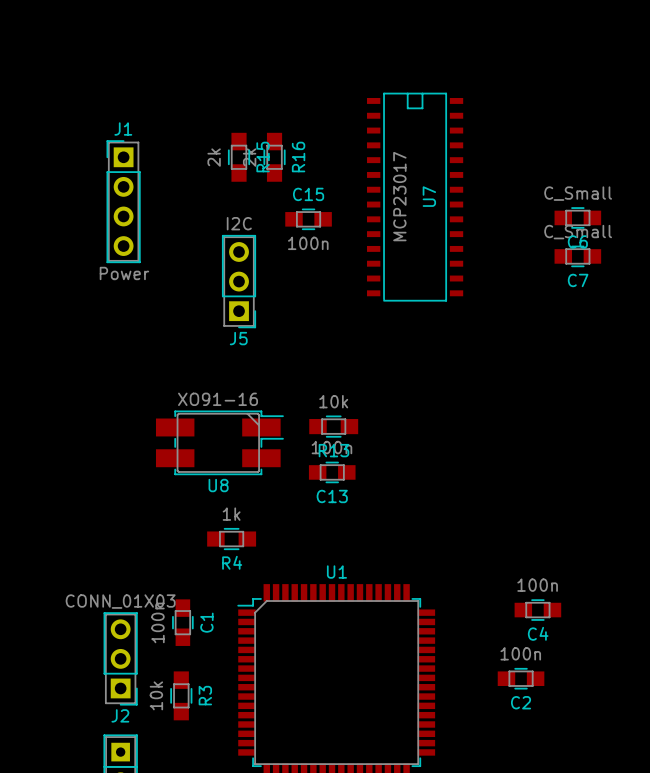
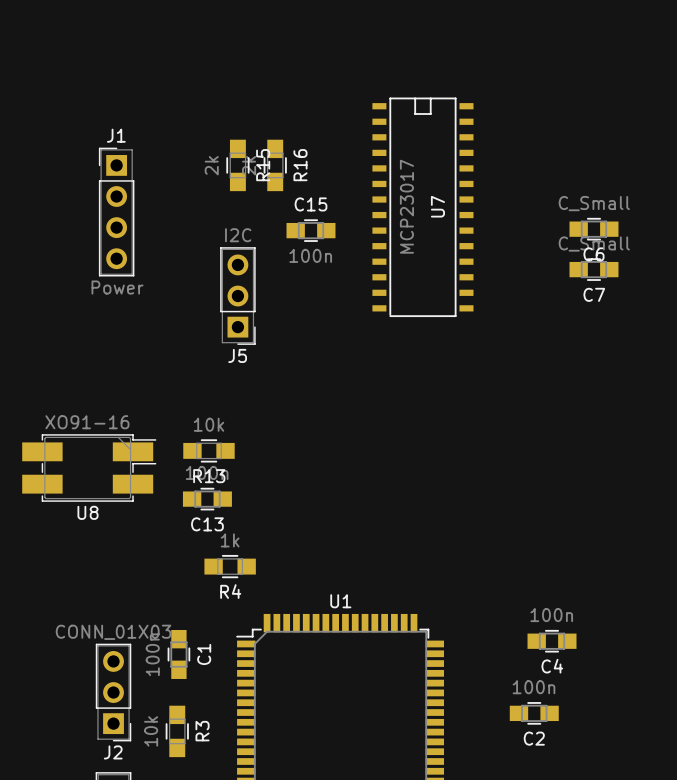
R13 position: (333, 426) -> (208, 450)
U8 position: (219, 442) -> (89, 468)
C13 position: (332, 472) -> (207, 499)

